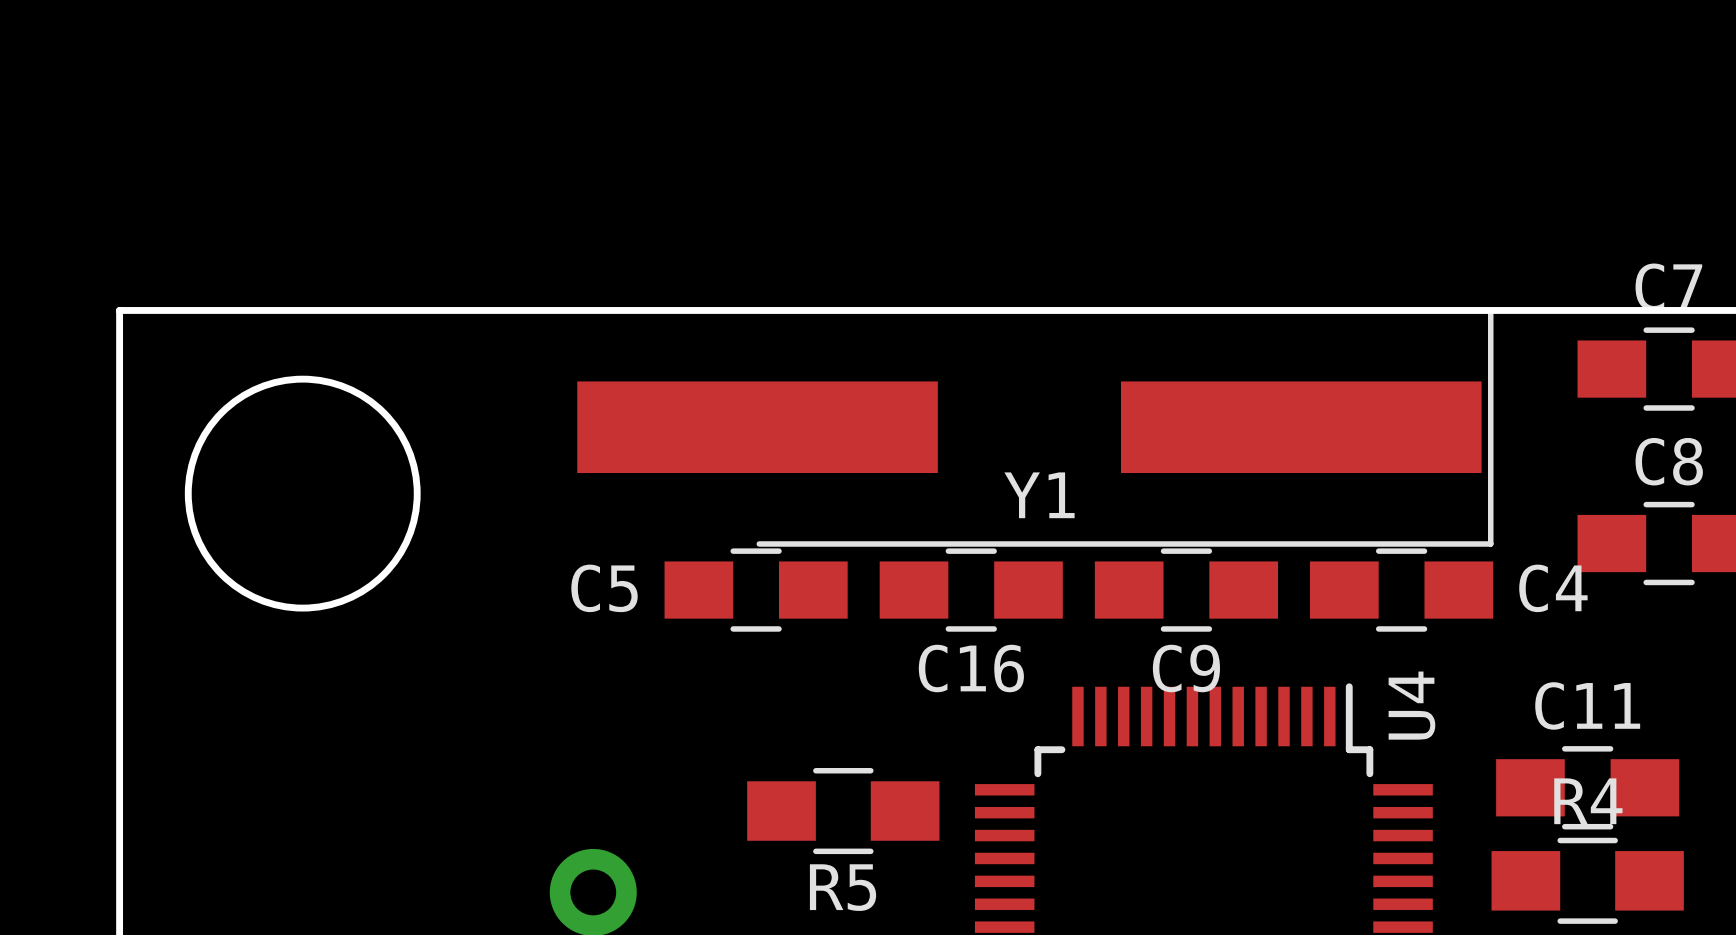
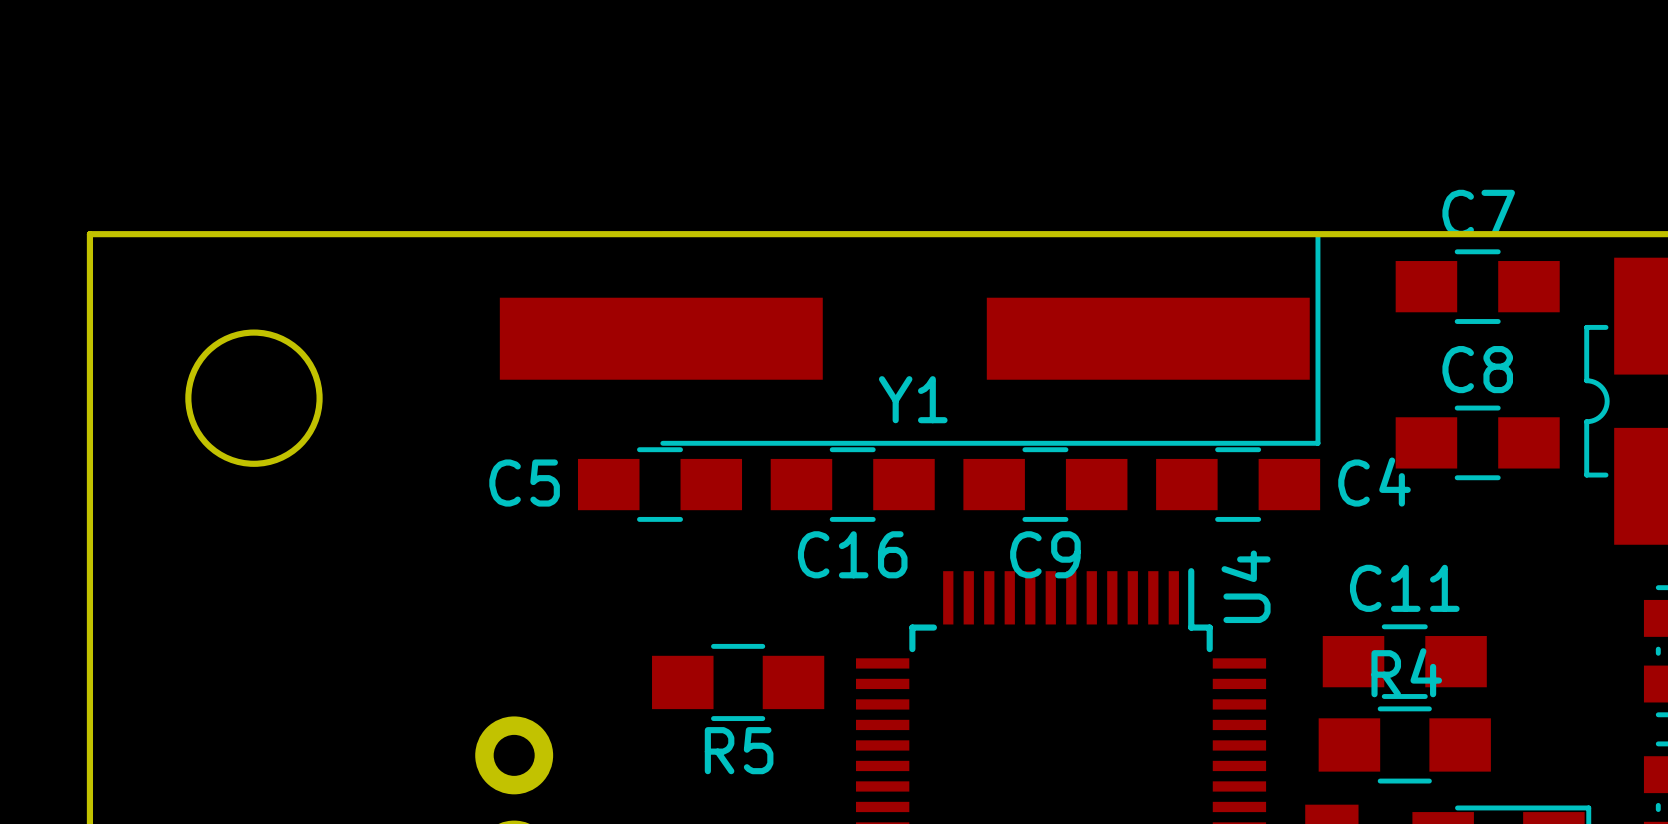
round board edge size: [184, 375, 421, 612] -> [185, 329, 323, 467]

